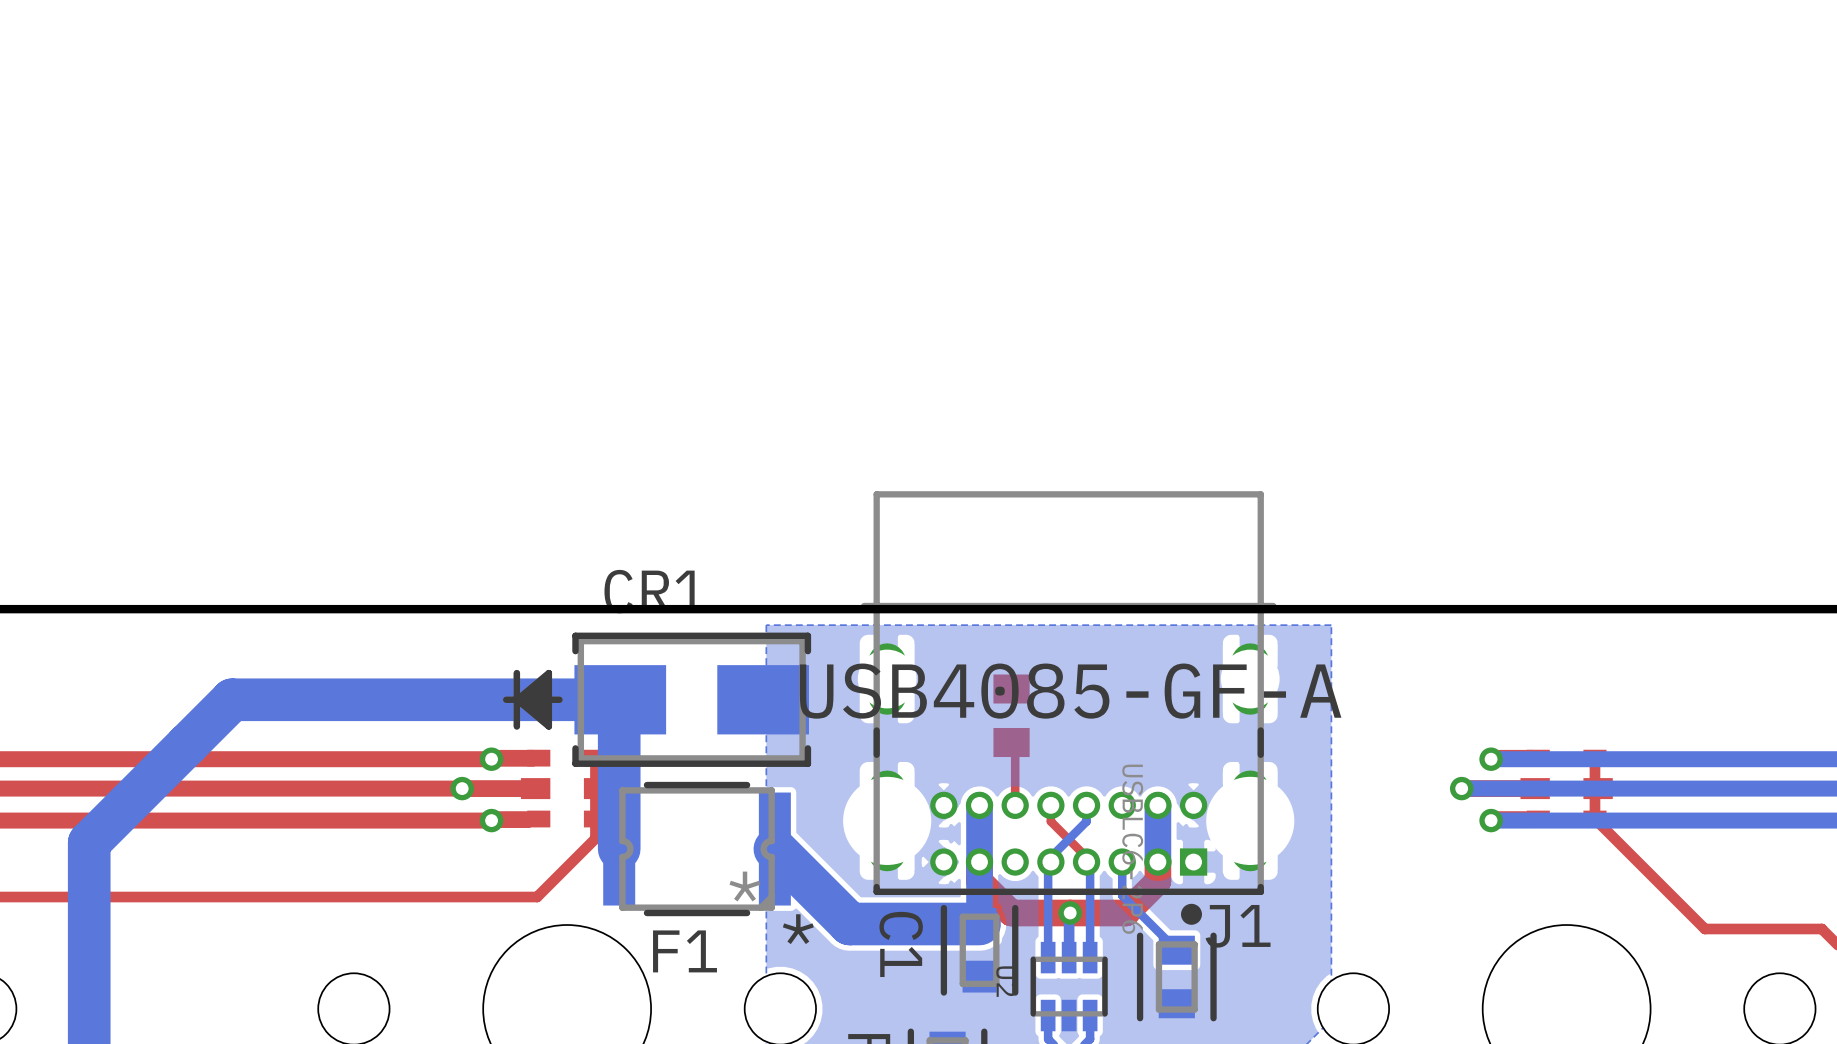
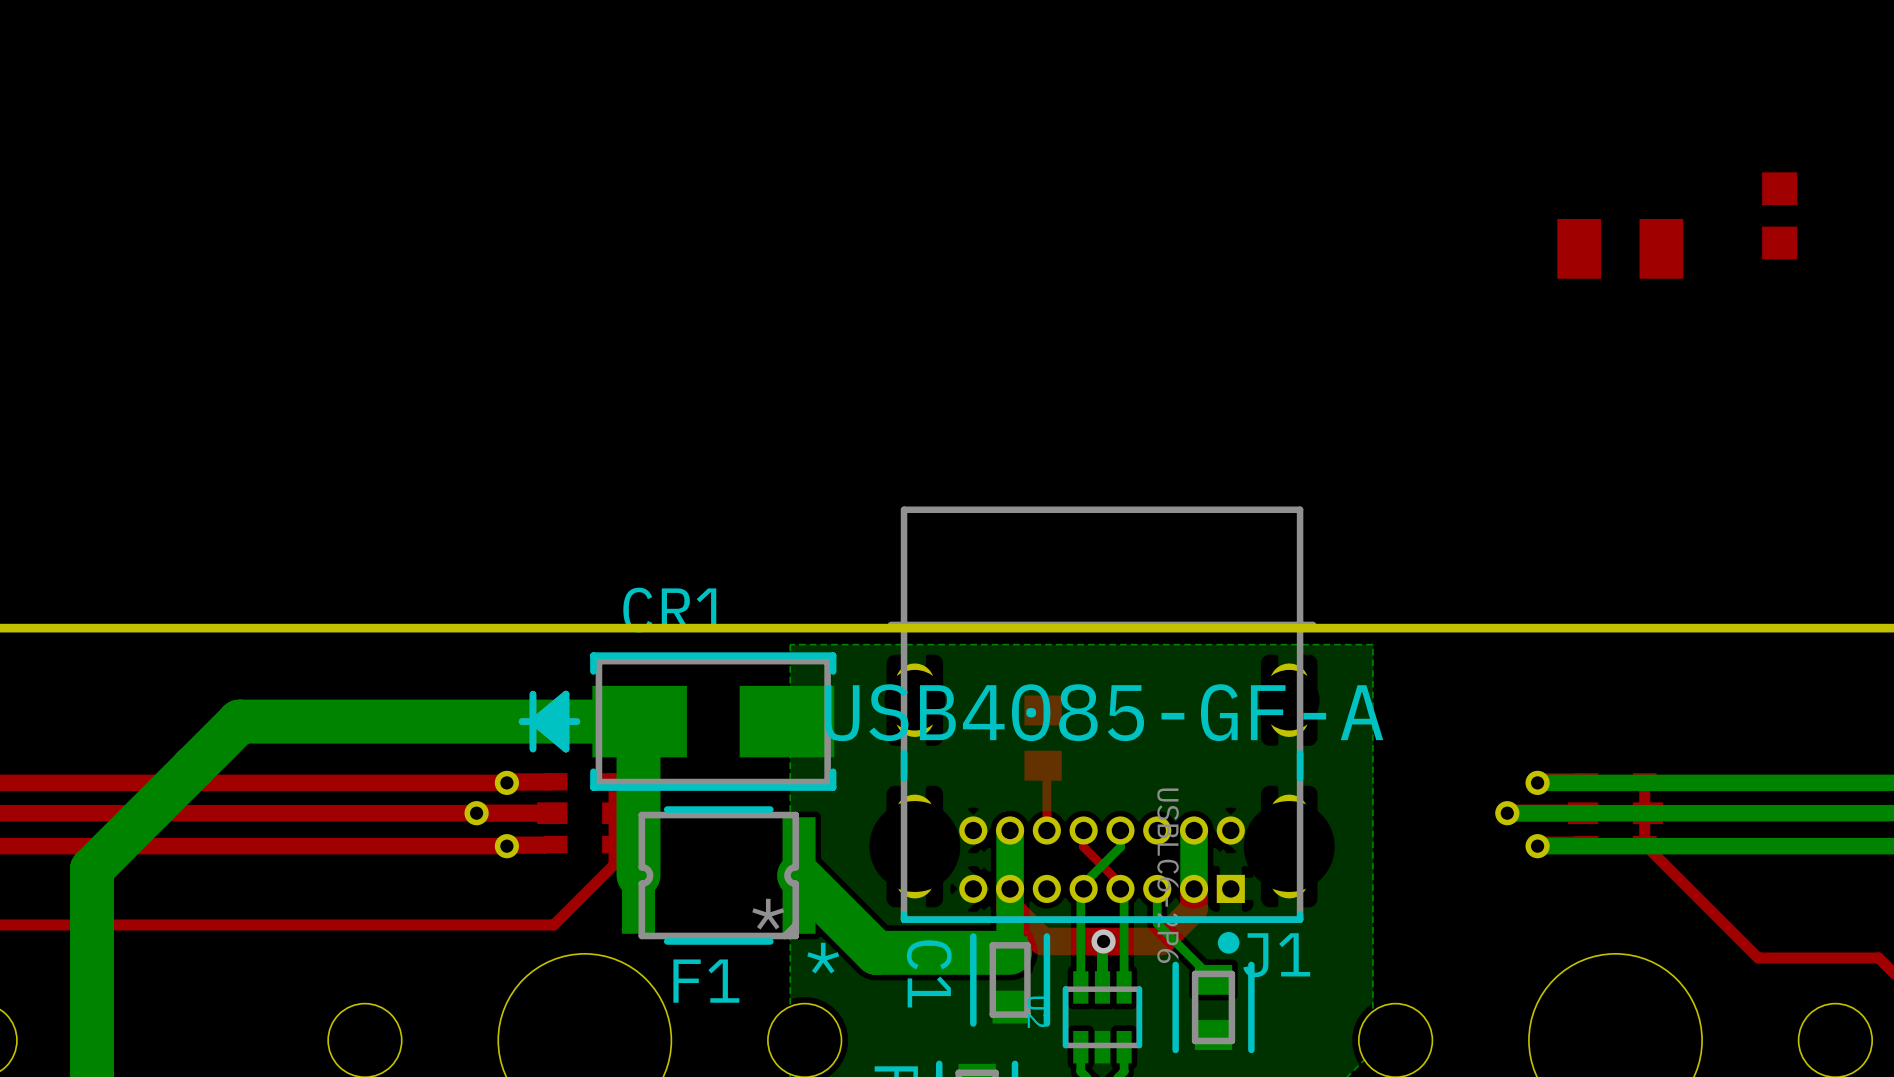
part: none -> (1779, 215)
part: none -> (1620, 248)

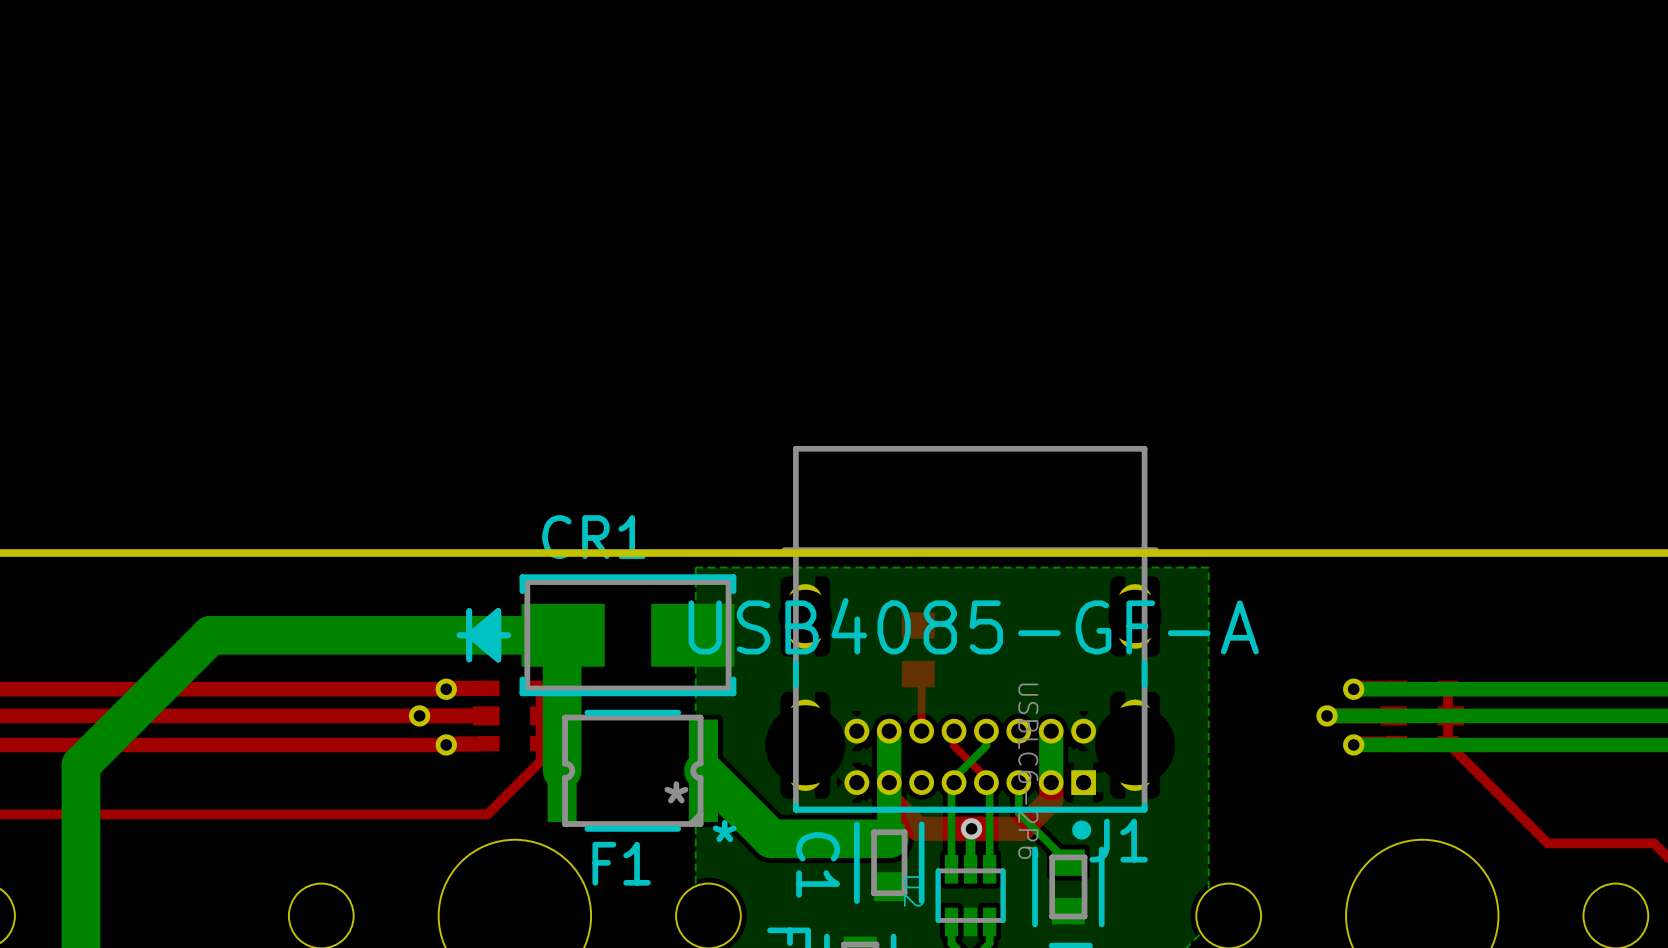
part: (1779, 215) -> none
part: (1620, 248) -> none

